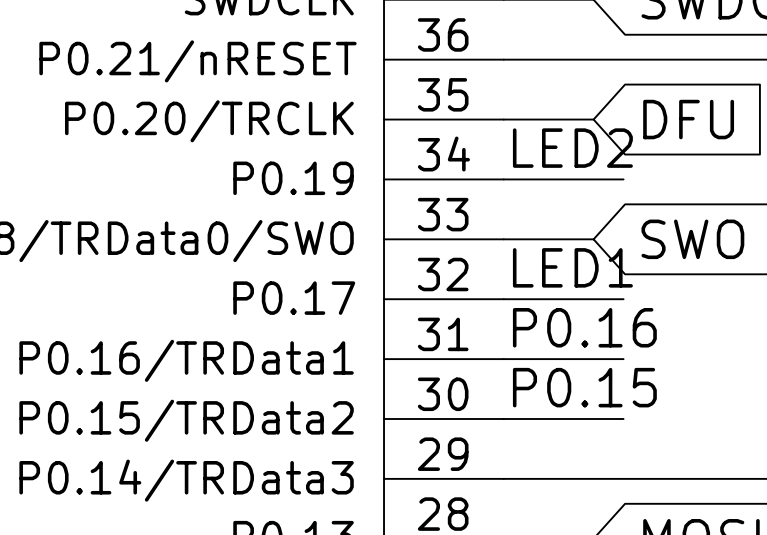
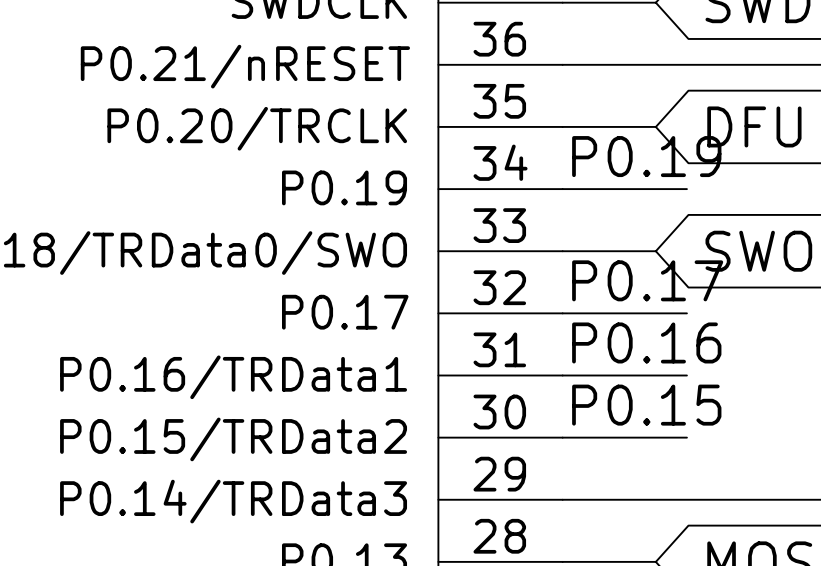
label: LED2 (572, 148) -> P0.19 (646, 156)
label: LED1 (572, 267) -> P0.17 (647, 280)

